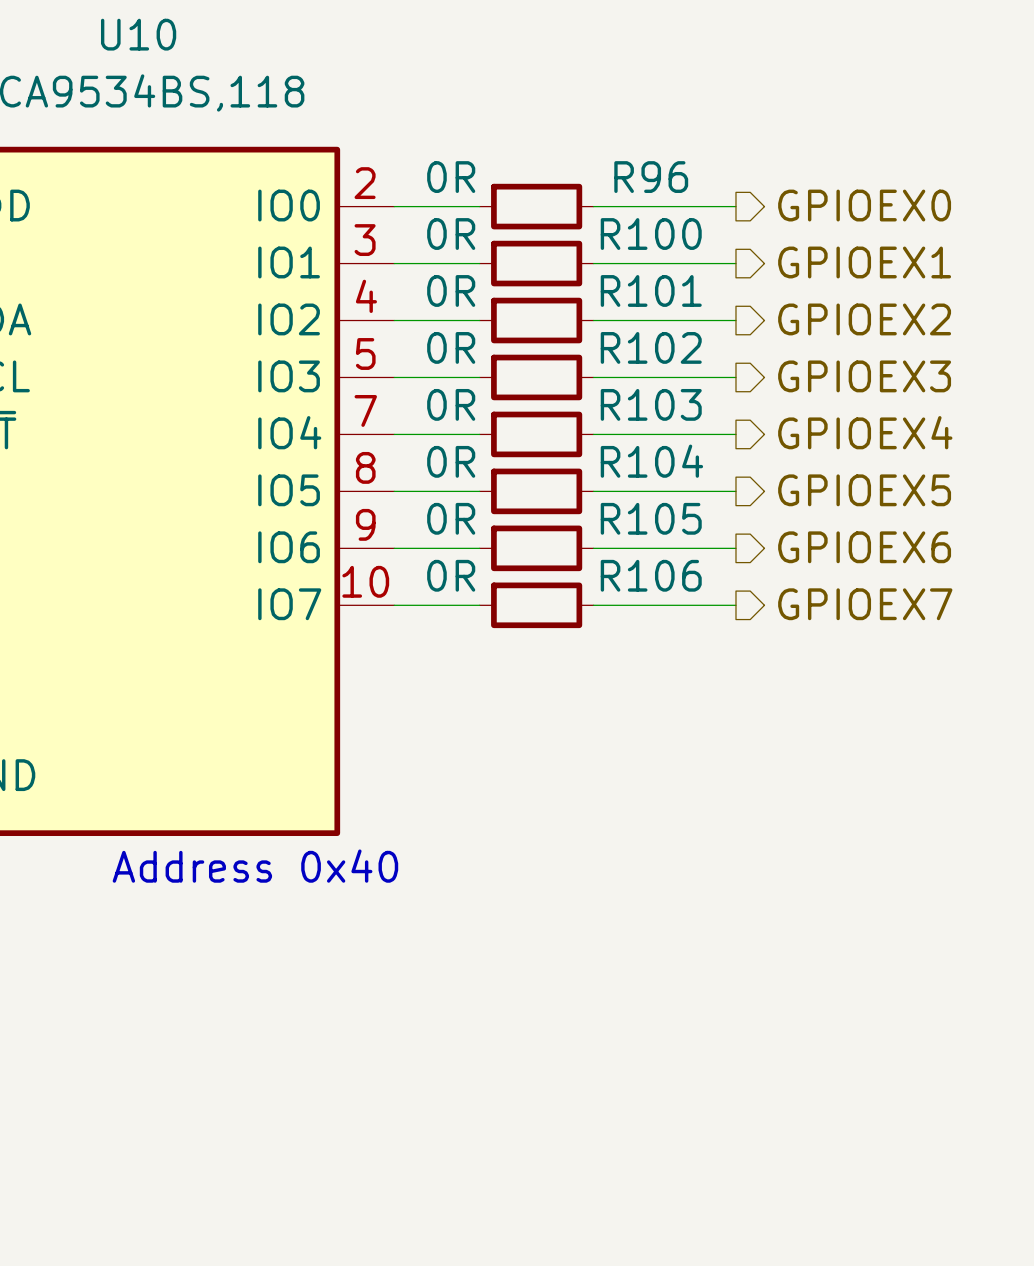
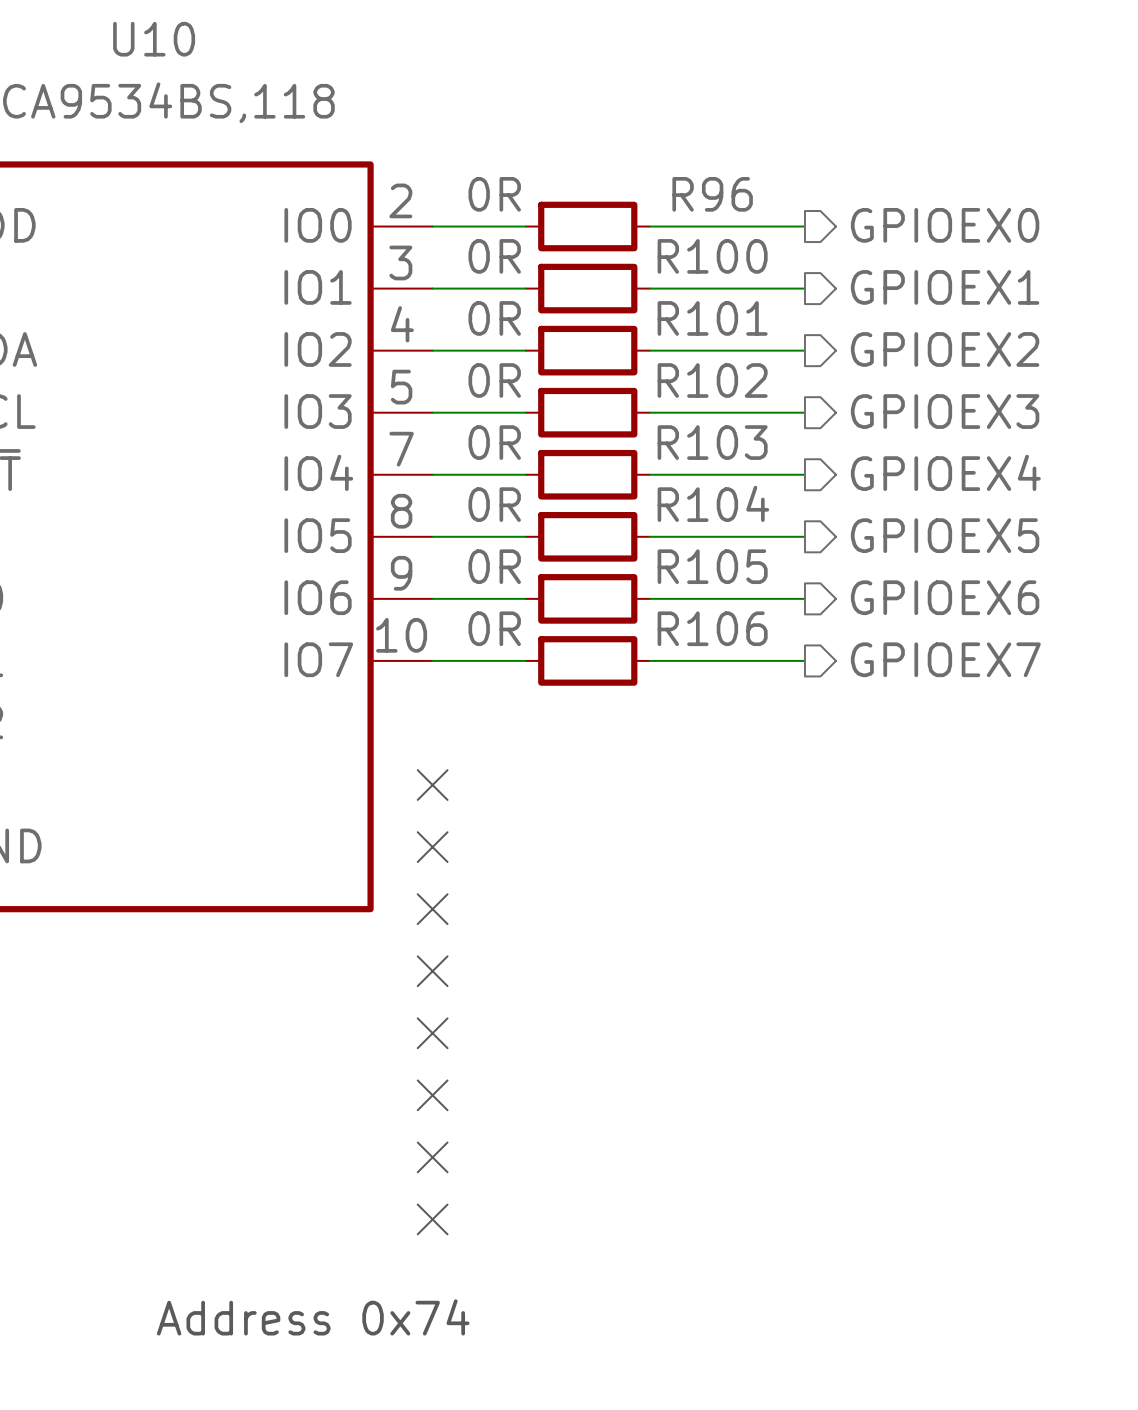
no-connect mark: none -> (432, 785)
no-connect mark: none -> (432, 847)
no-connect mark: none -> (432, 909)
text: Address 0x40 (255, 866) -> none
no-connect mark: none -> (432, 971)
no-connect mark: none -> (432, 1033)
no-connect mark: none -> (432, 1095)
no-connect mark: none -> (432, 1157)
no-connect mark: none -> (432, 1219)
text: none -> Address 0x74 (313, 1317)

